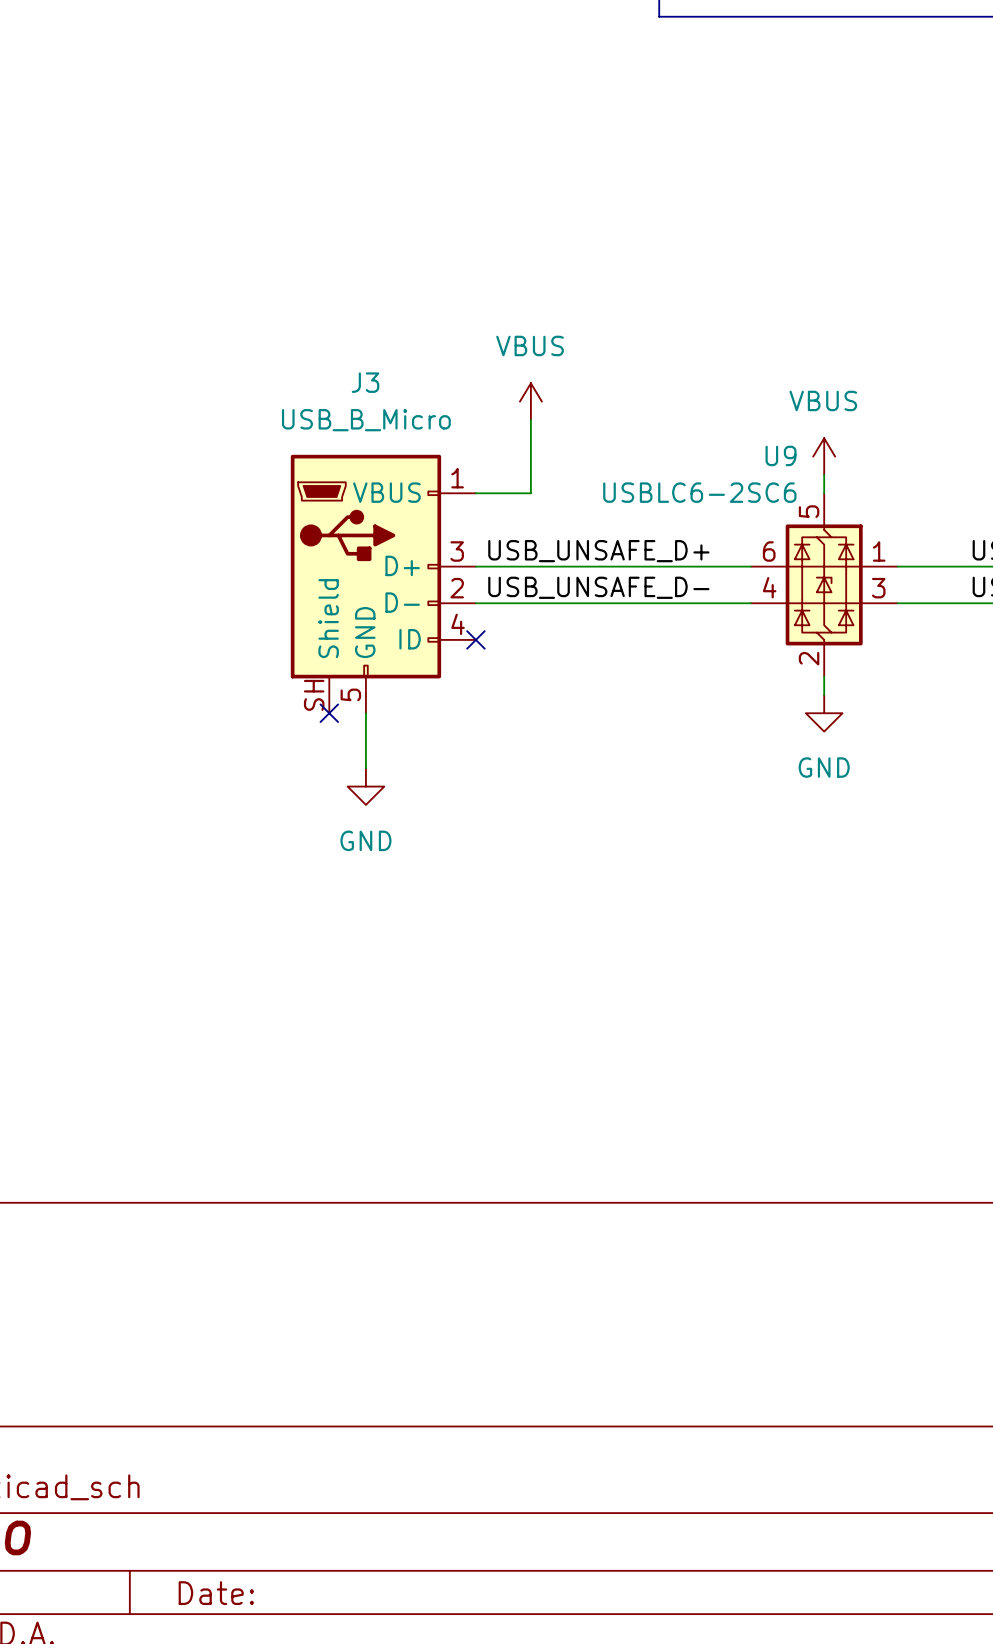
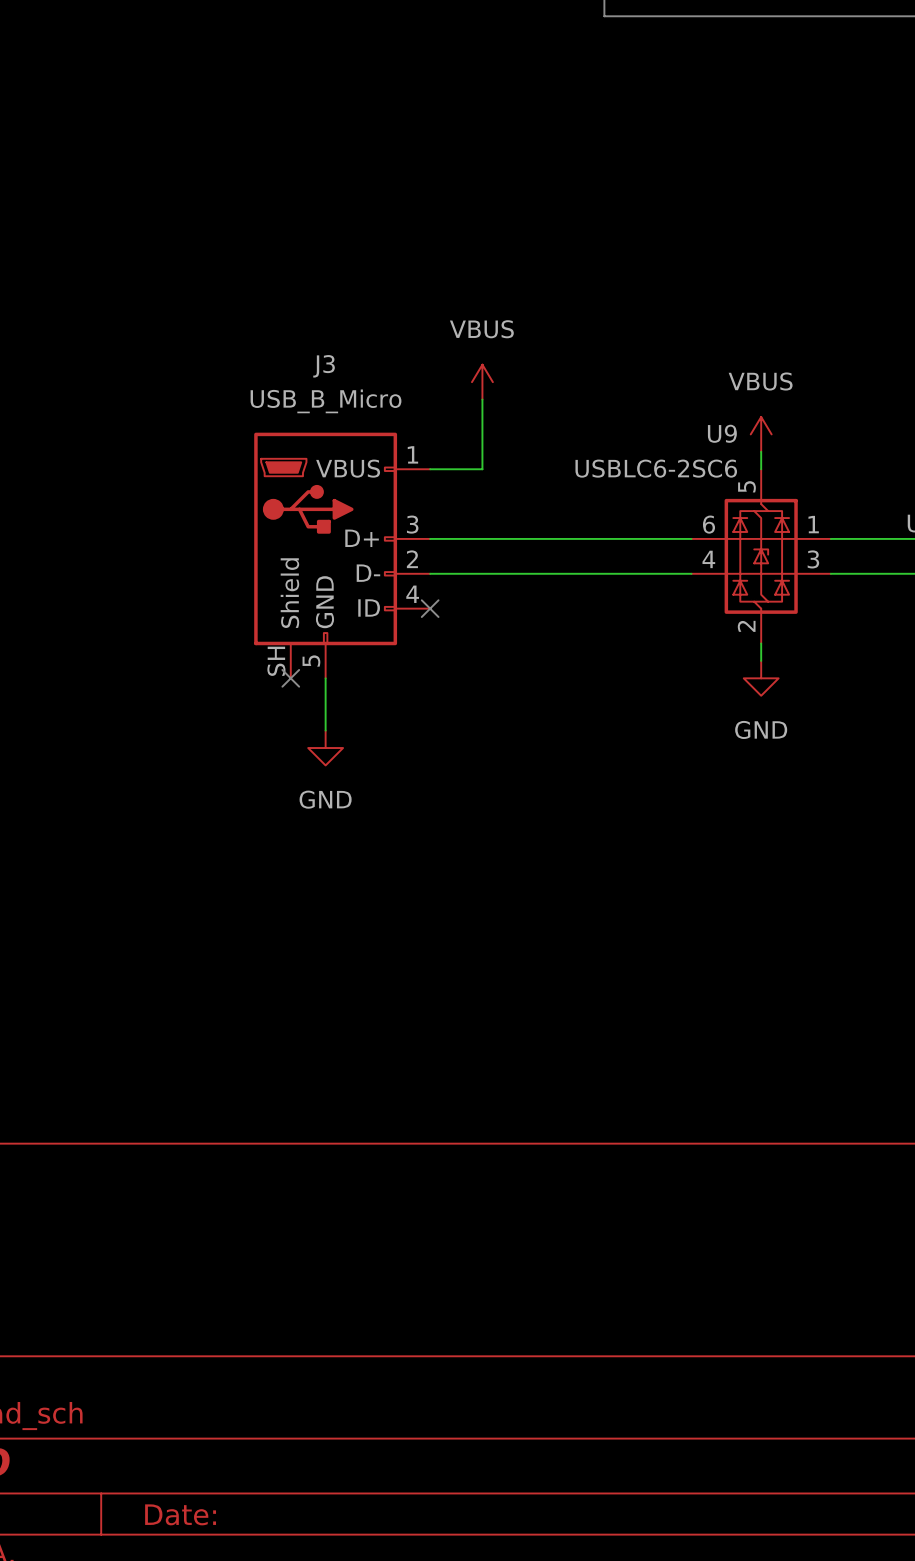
label: USB_UNSAFE_D+ (598, 551) -> none
label: USB_UNSAFE_D- (598, 587) -> none

